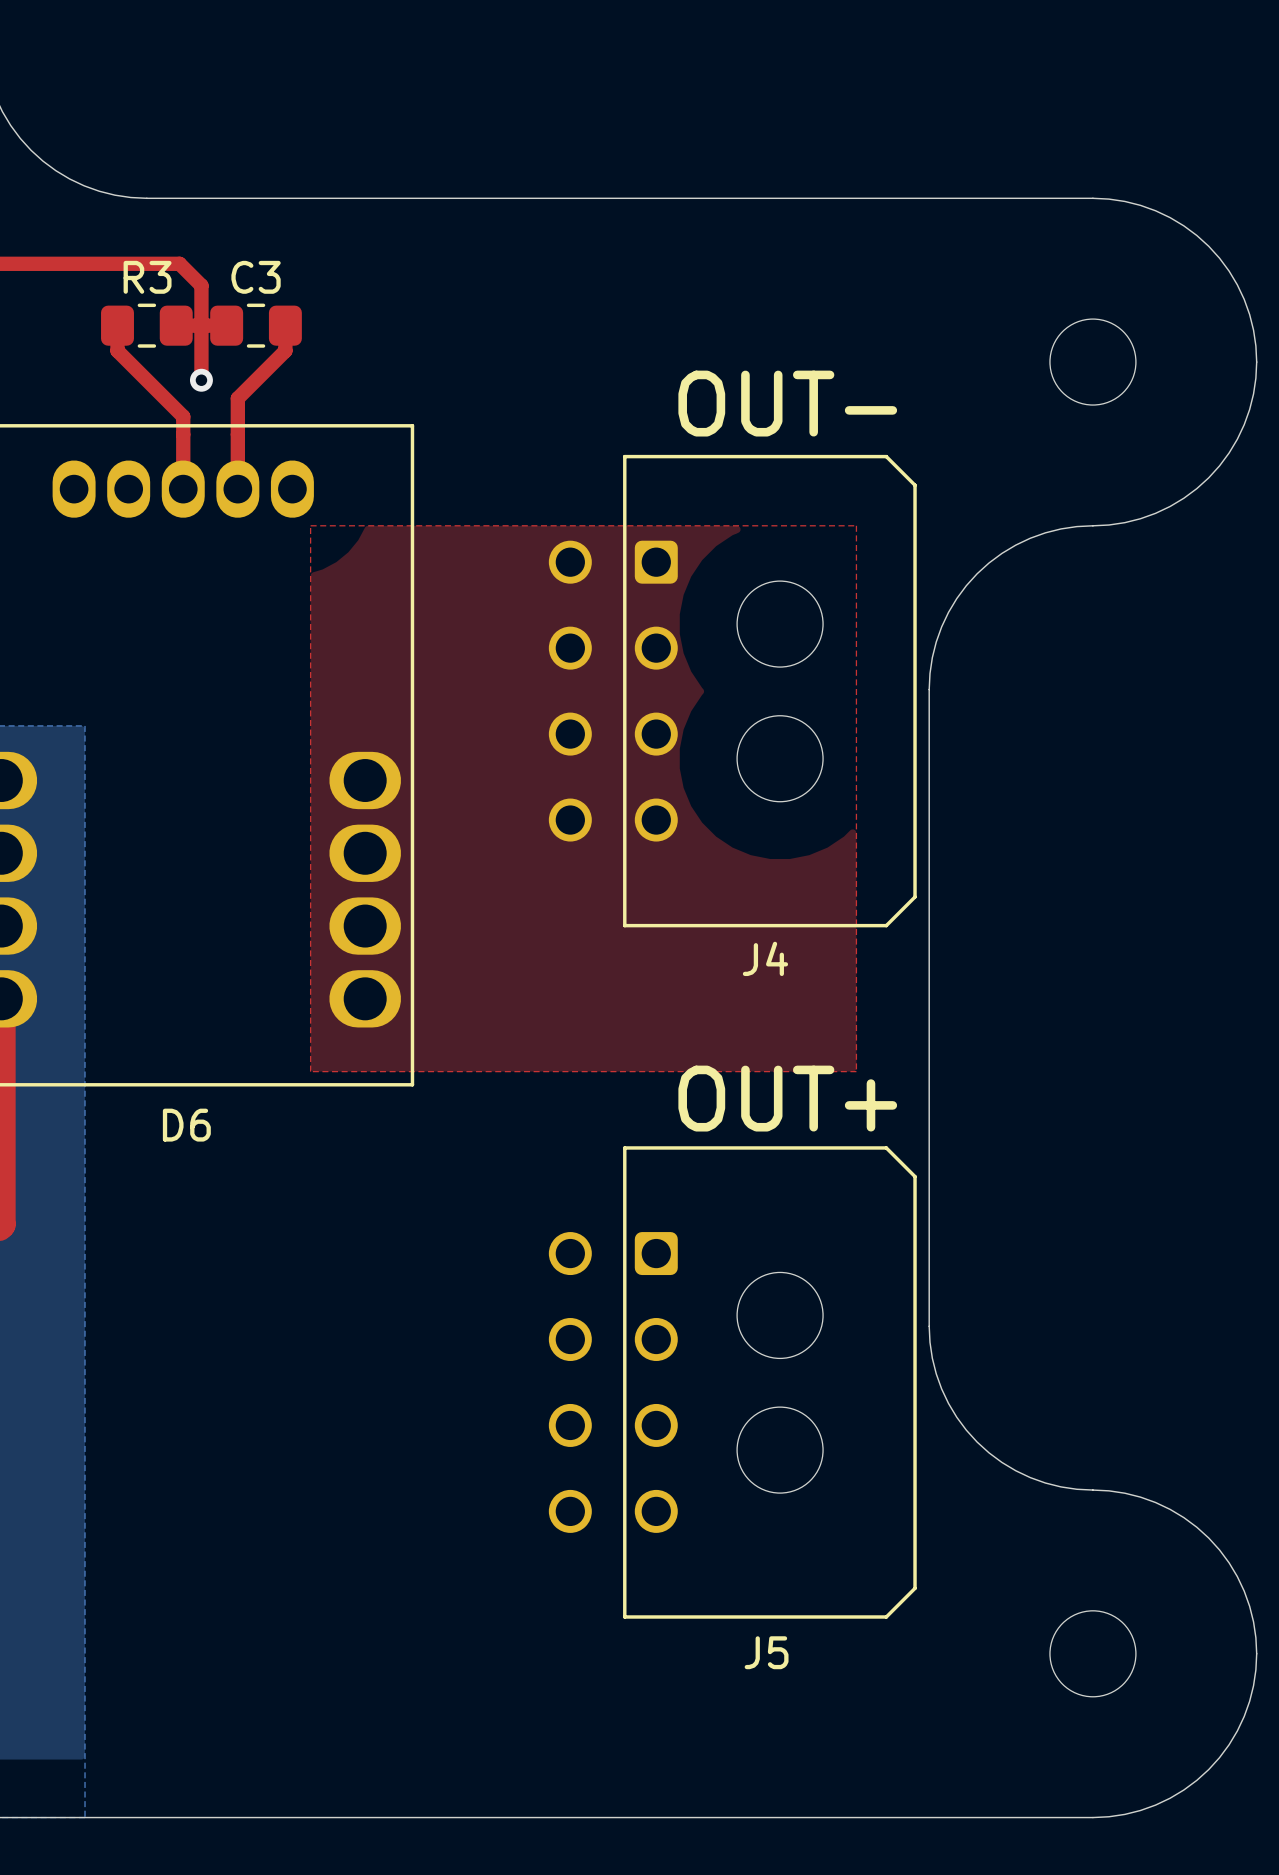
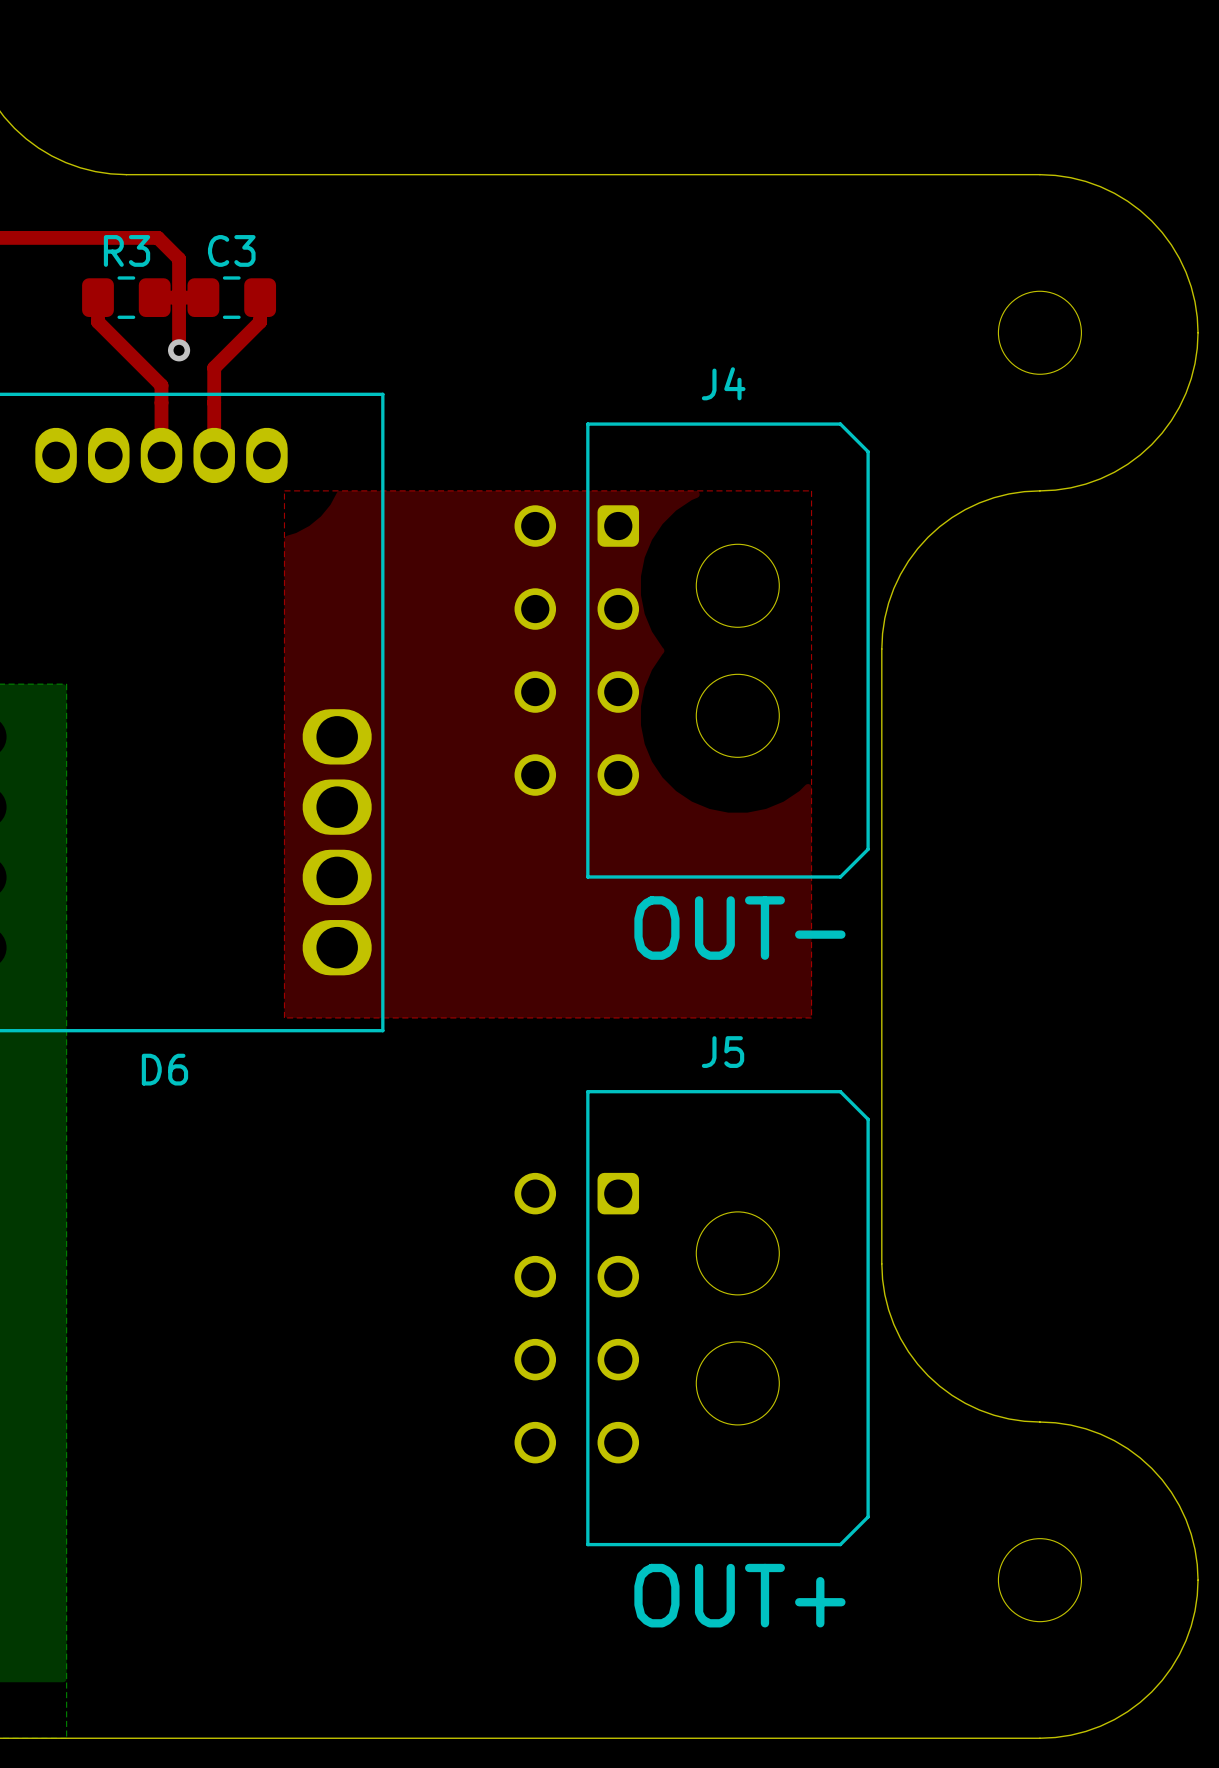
J4 value position: OUT- (787, 403) -> OUT- (739, 928)
J4 name position: J4 (765, 958) -> J4 (723, 383)
J5 value position: OUT+ (787, 1098) -> OUT+ (739, 1595)
J5 name position: J5 (766, 1652) -> J5 (723, 1052)

